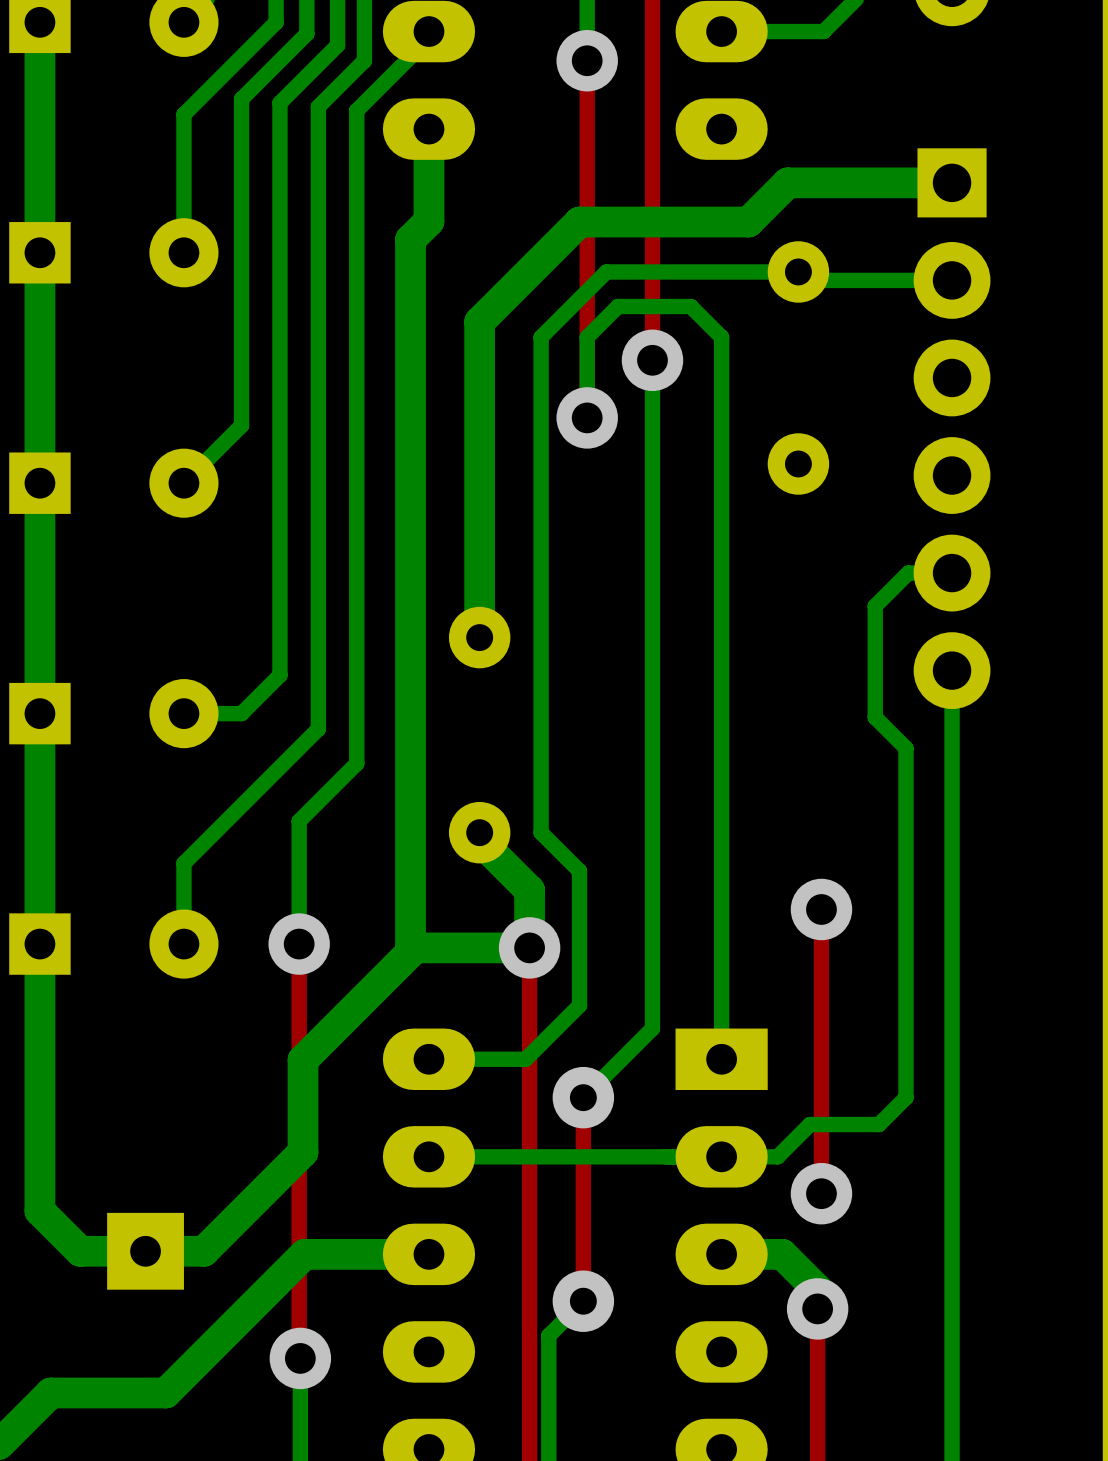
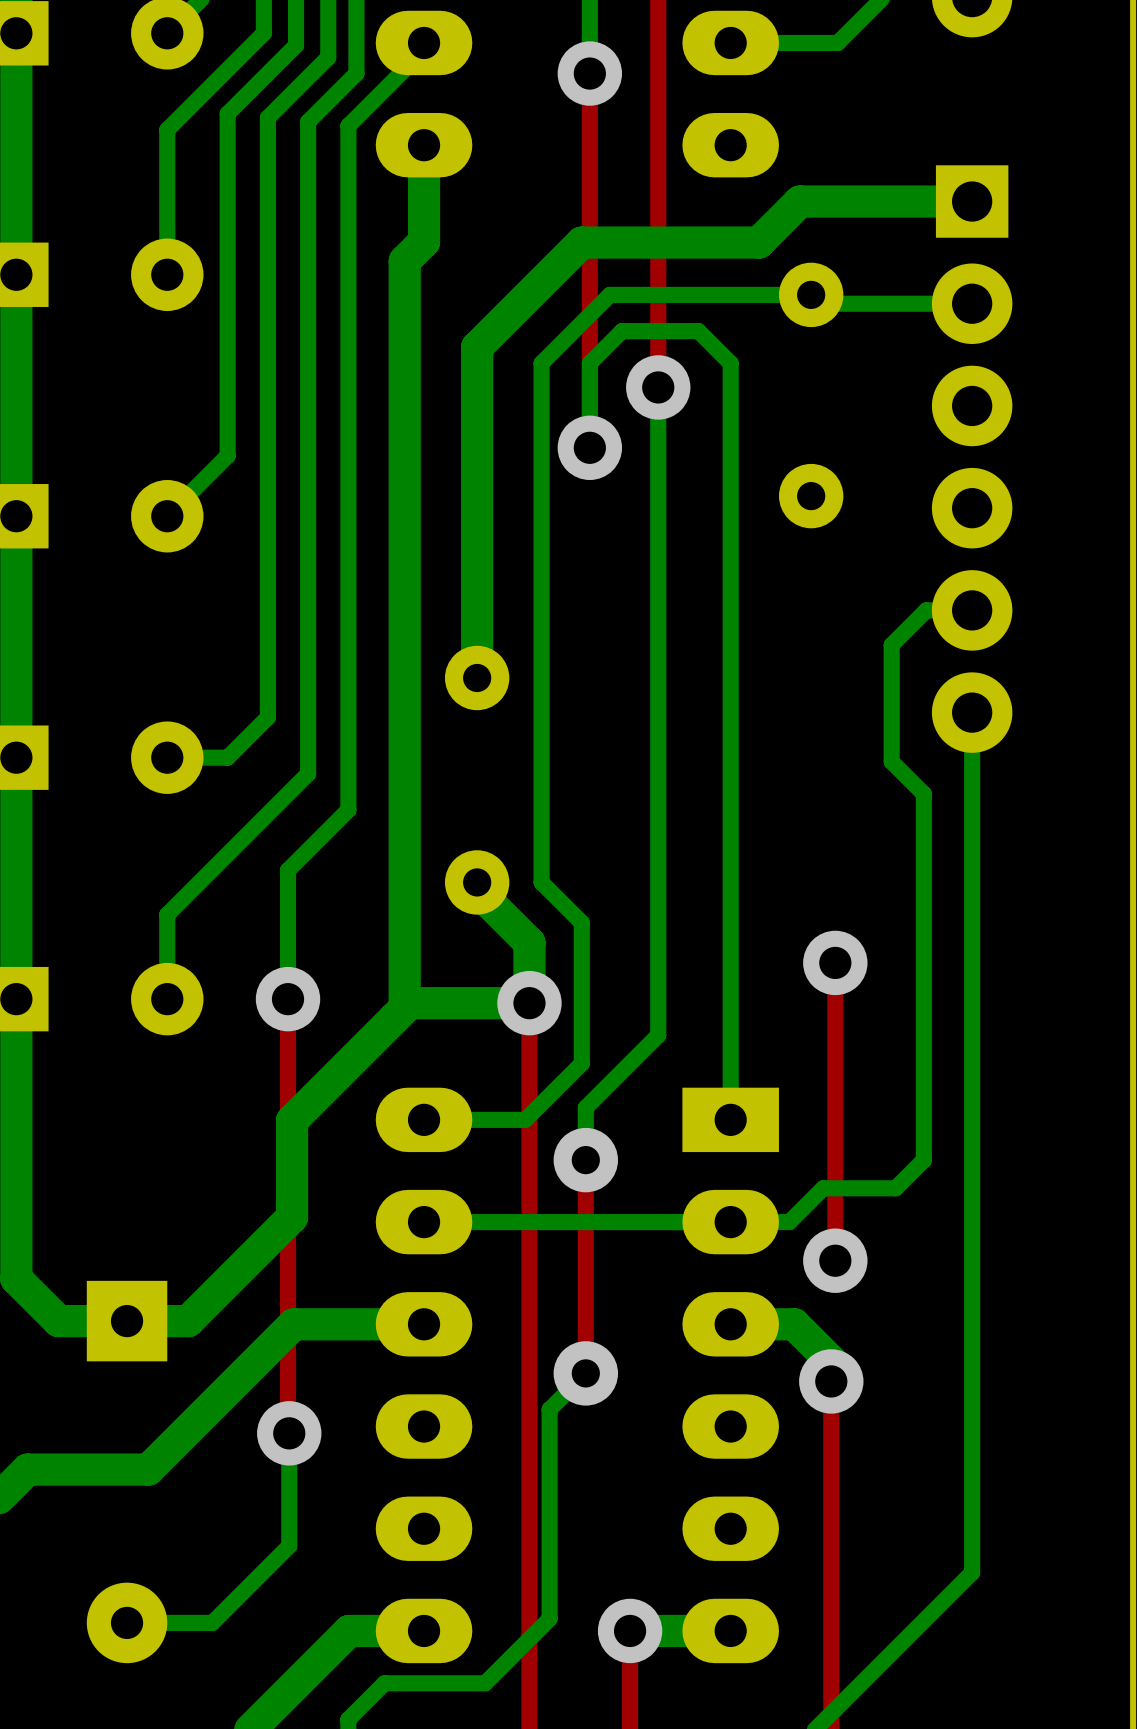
bottom track: (652, 978) (652, 1028) (583, 1097) -> (658, 1035) (585, 1107) (585, 1160)

